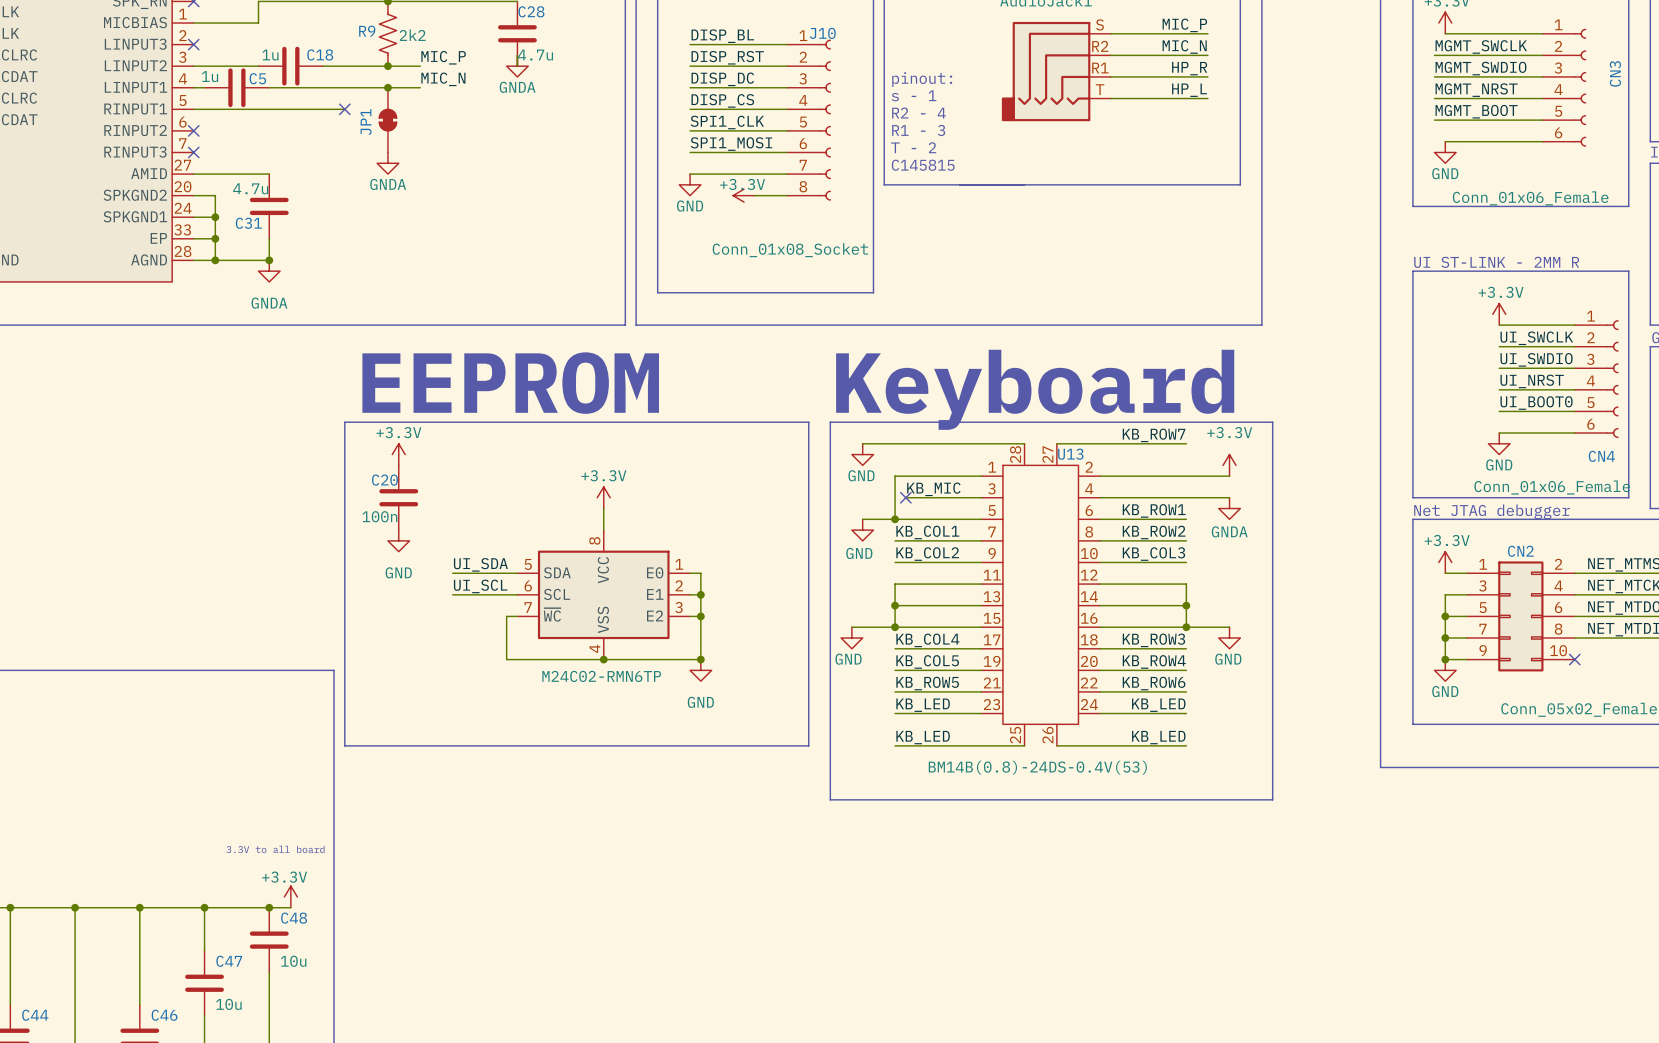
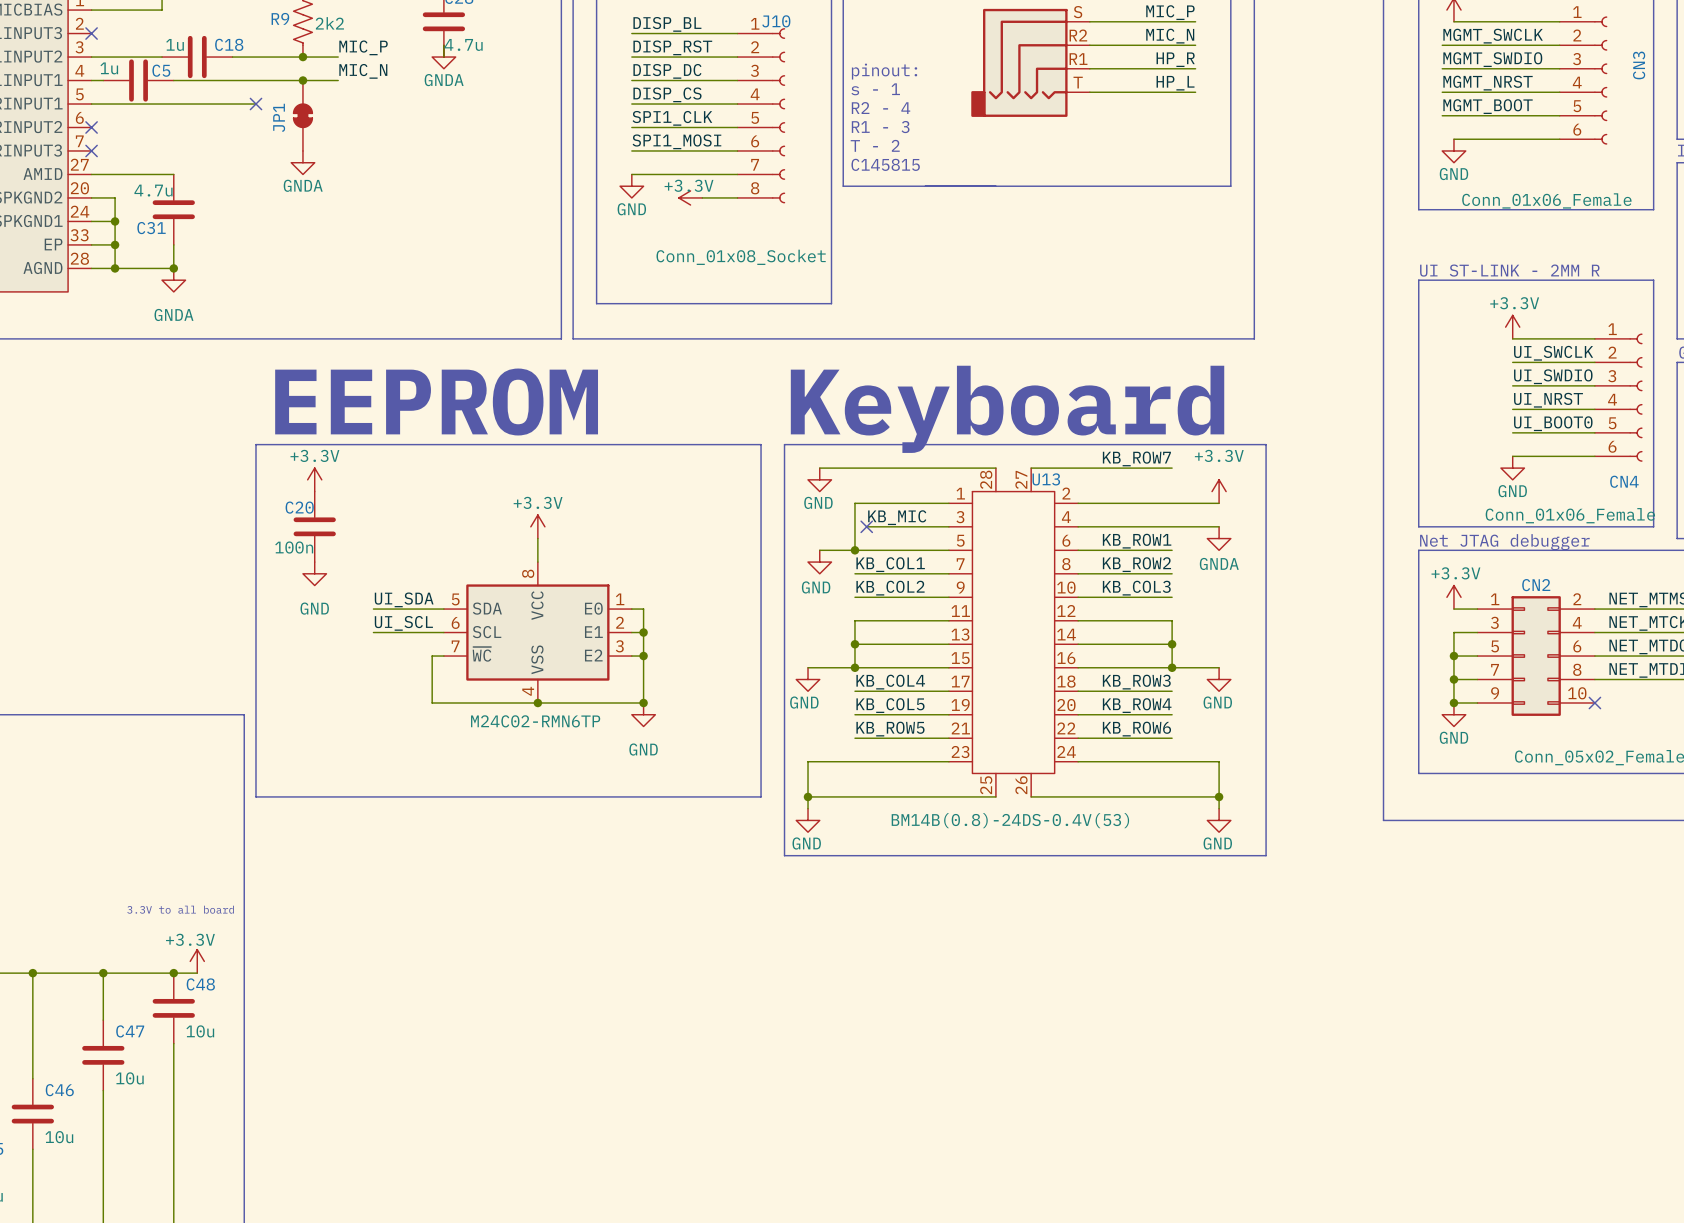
label: KB_LED (923, 705) -> none
label: KB_LED (1158, 705) -> none
wire: none -> (854, 761) (808, 761) (808, 808)
wire: none -> (1172, 761) (1219, 761) (1219, 808)
label: KB_LED (923, 737) -> none
label: KB_LED (1158, 737) -> none
wire: none -> (808, 796) (854, 796)
junction: none -> (808, 796)
wire: none -> (1172, 796) (1219, 796)
junction: none -> (1219, 796)
power symbol: none -> GND (808, 820)
power symbol: none -> GND (1219, 820)

